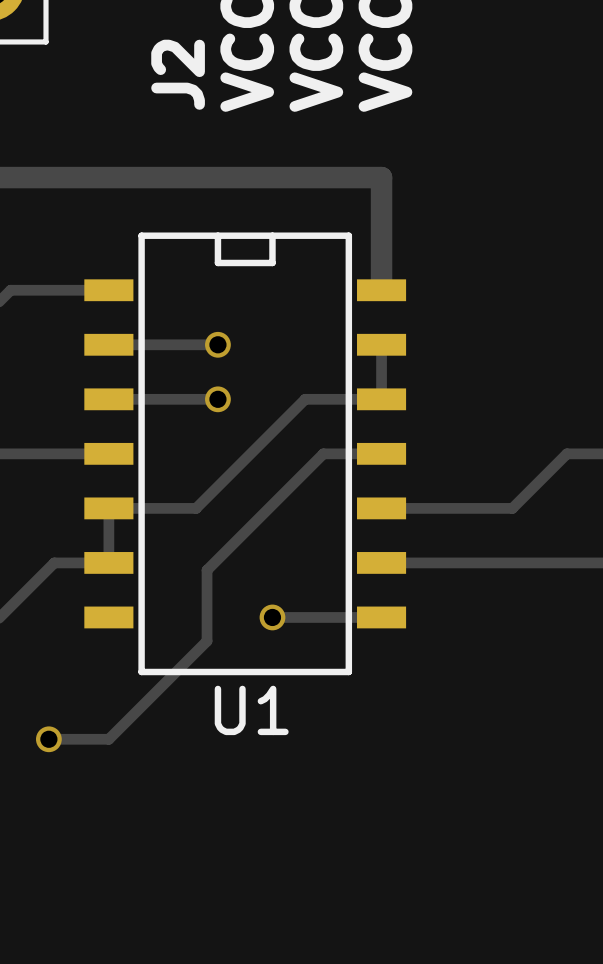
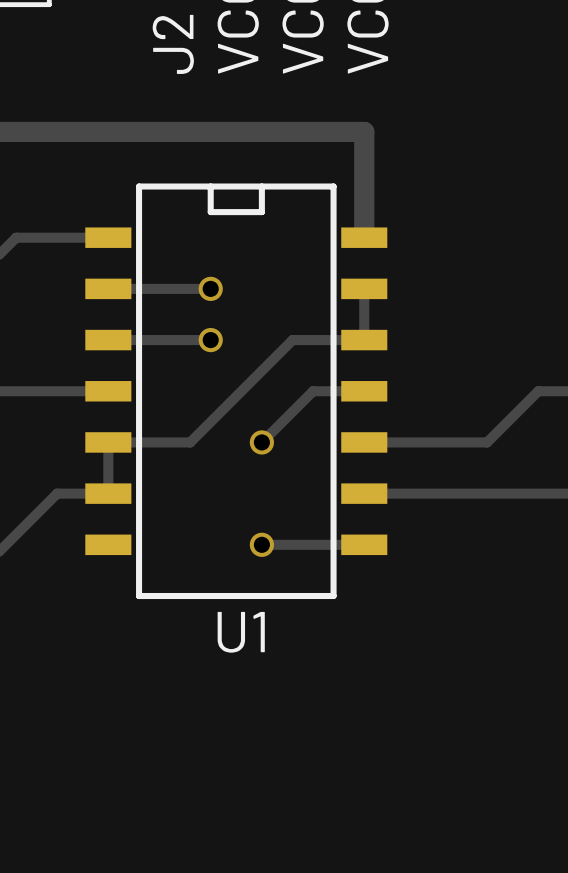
track: (327, 453) (323, 453) (207, 570) (207, 641) (108, 739) (48, 739) -> (313, 391) (261, 442)
via: none -> (261, 442)
via: (48, 739) -> none

